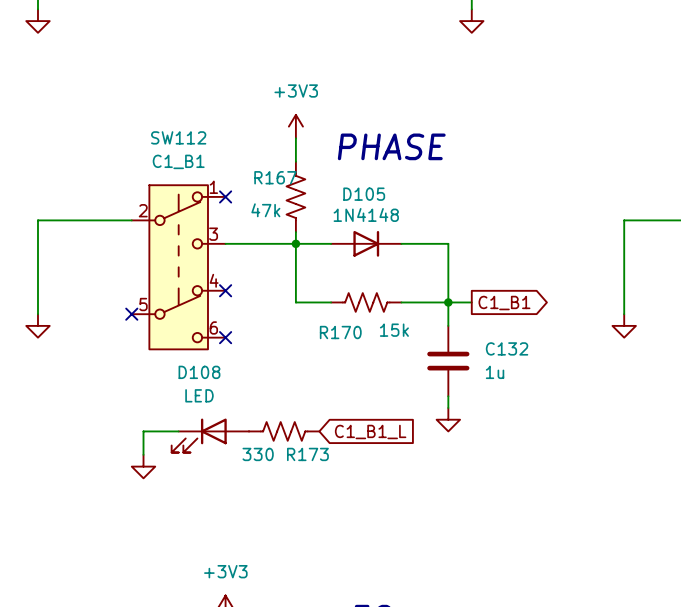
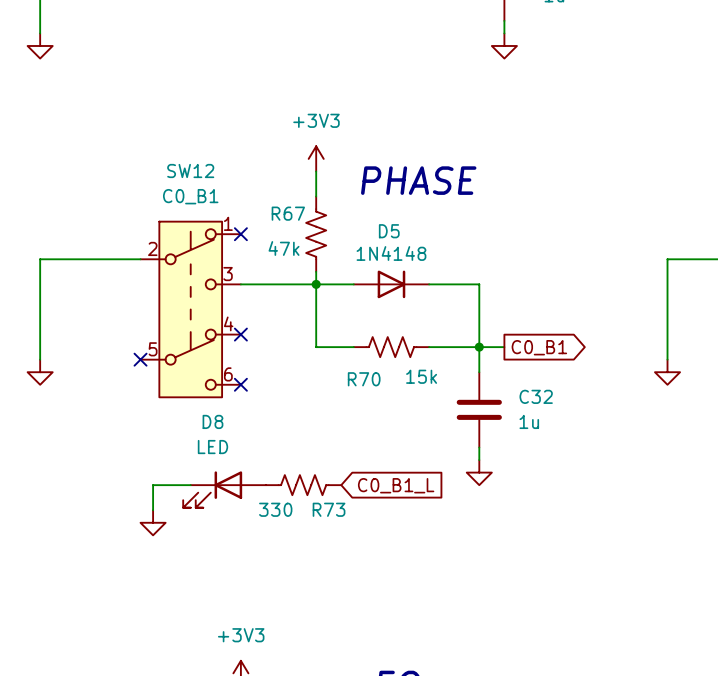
SW112 name: SW112 (178, 137) -> SW12 (190, 170)
SW112 value: C1_B1 (178, 161) -> C0_B1 (190, 196)
R167 name: R167 (275, 177) -> R67 (288, 213)
D105 name: D105 (364, 194) -> D5 (389, 231)
global label: C1_B1 (504, 303) -> C0_B1 (539, 347)
R170 name: R170 (340, 332) -> R70 (364, 379)
C132 name: C132 (507, 348) -> C32 (536, 396)
D108 name: D108 (199, 372) -> D8 (212, 421)
global label: C1_B1_L (370, 431) -> C0_B1_L (396, 485)
R173 name: R173 (307, 454) -> R73 (329, 509)

